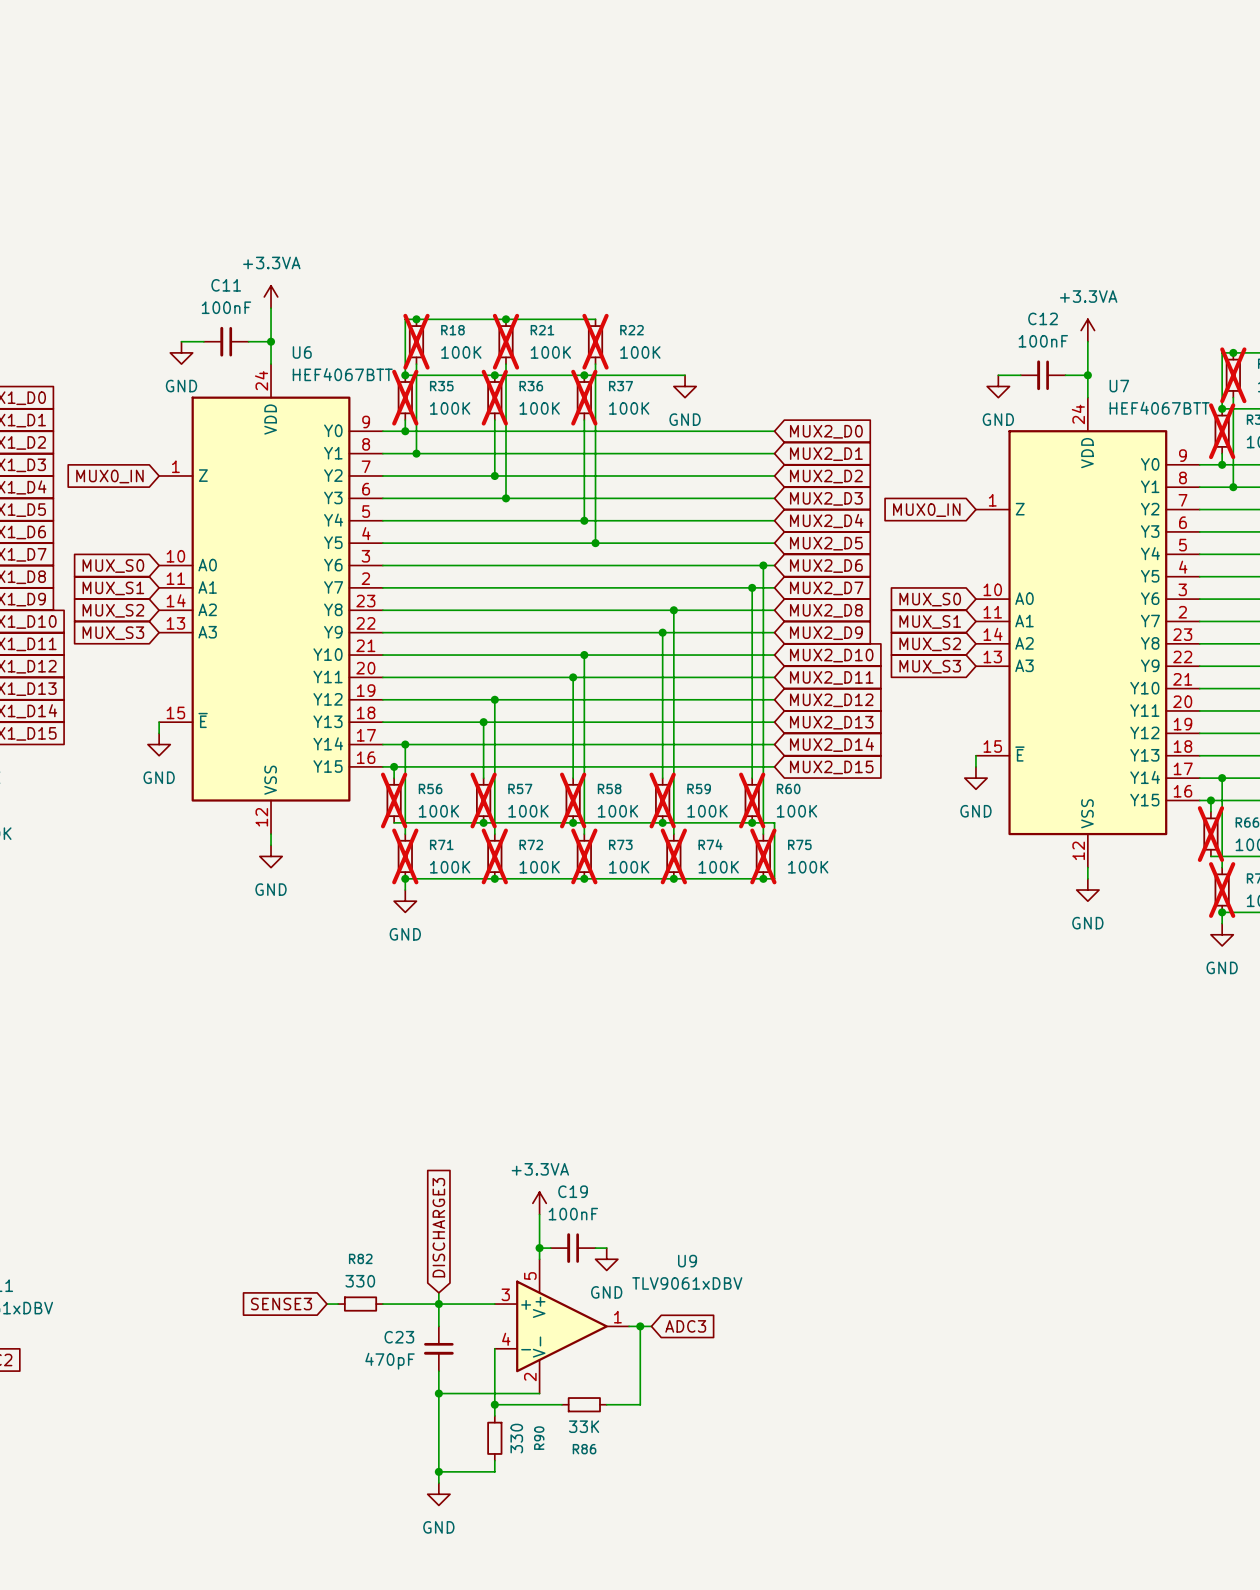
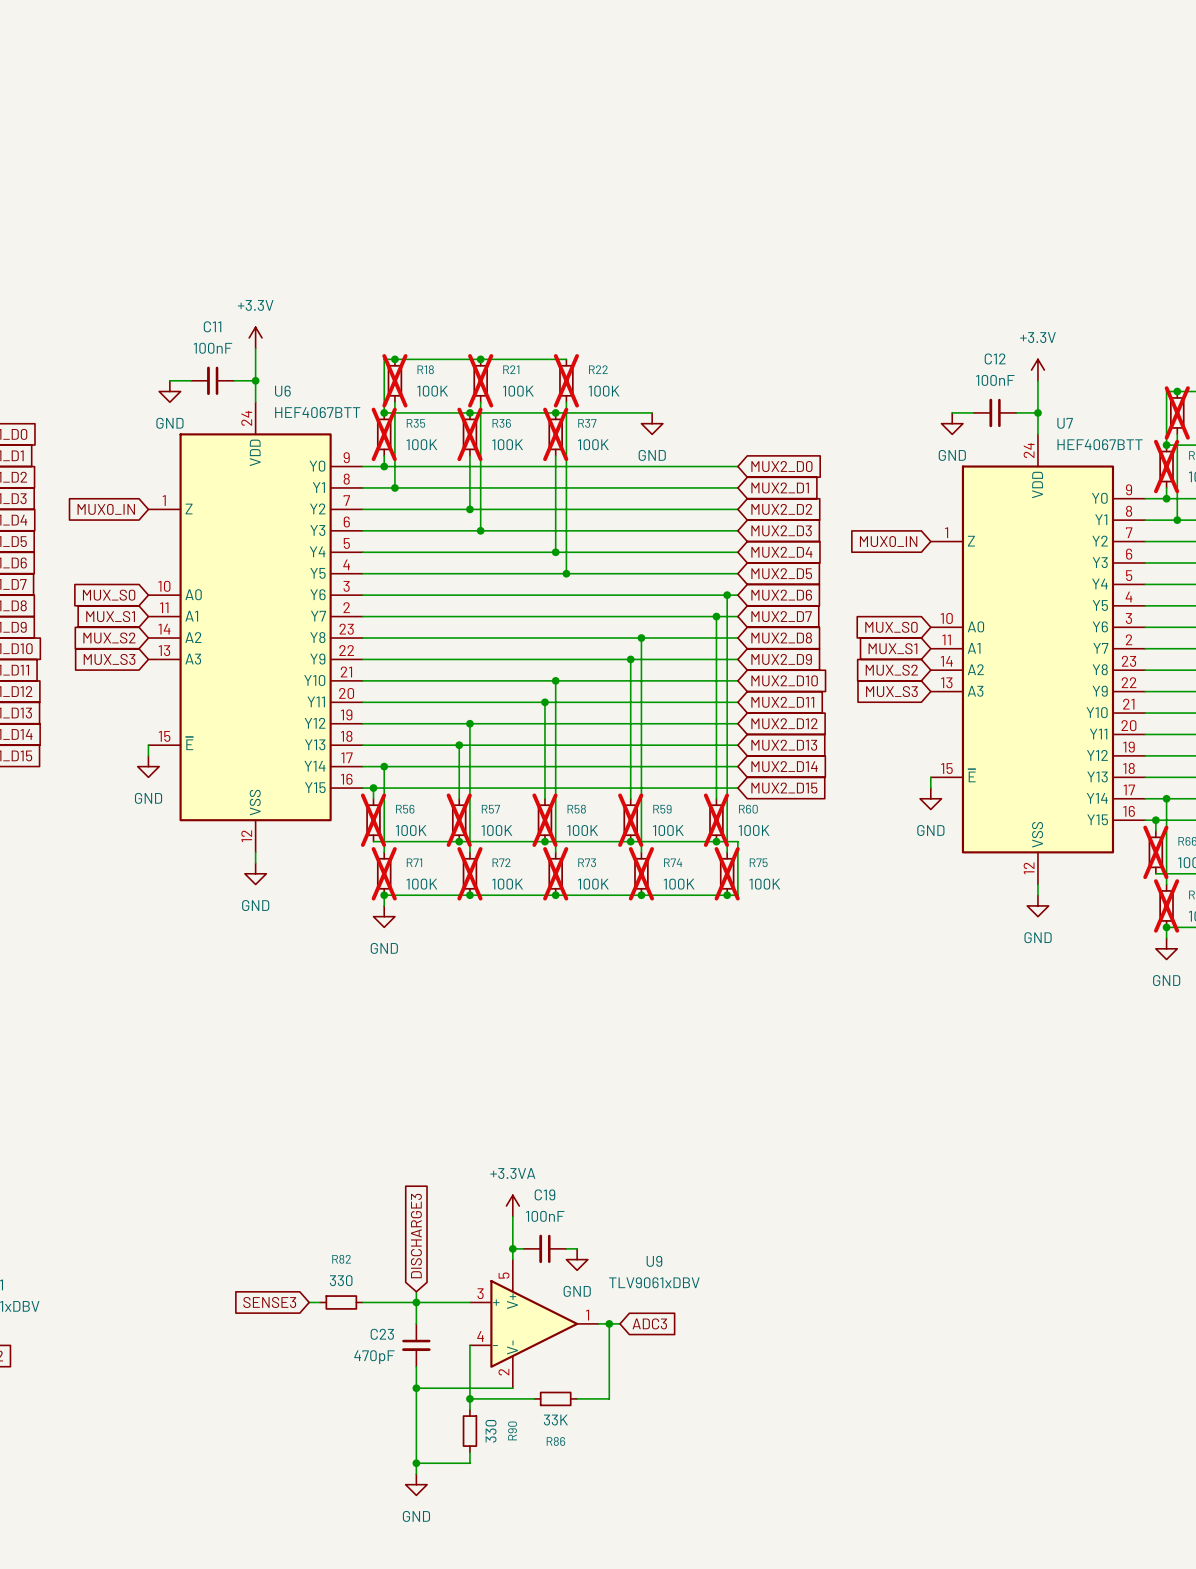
power symbol: +3.3VA (271, 296) -> +3.3V (255, 337)
power symbol: +3.3VA (1087, 330) -> +3.3V (1037, 370)

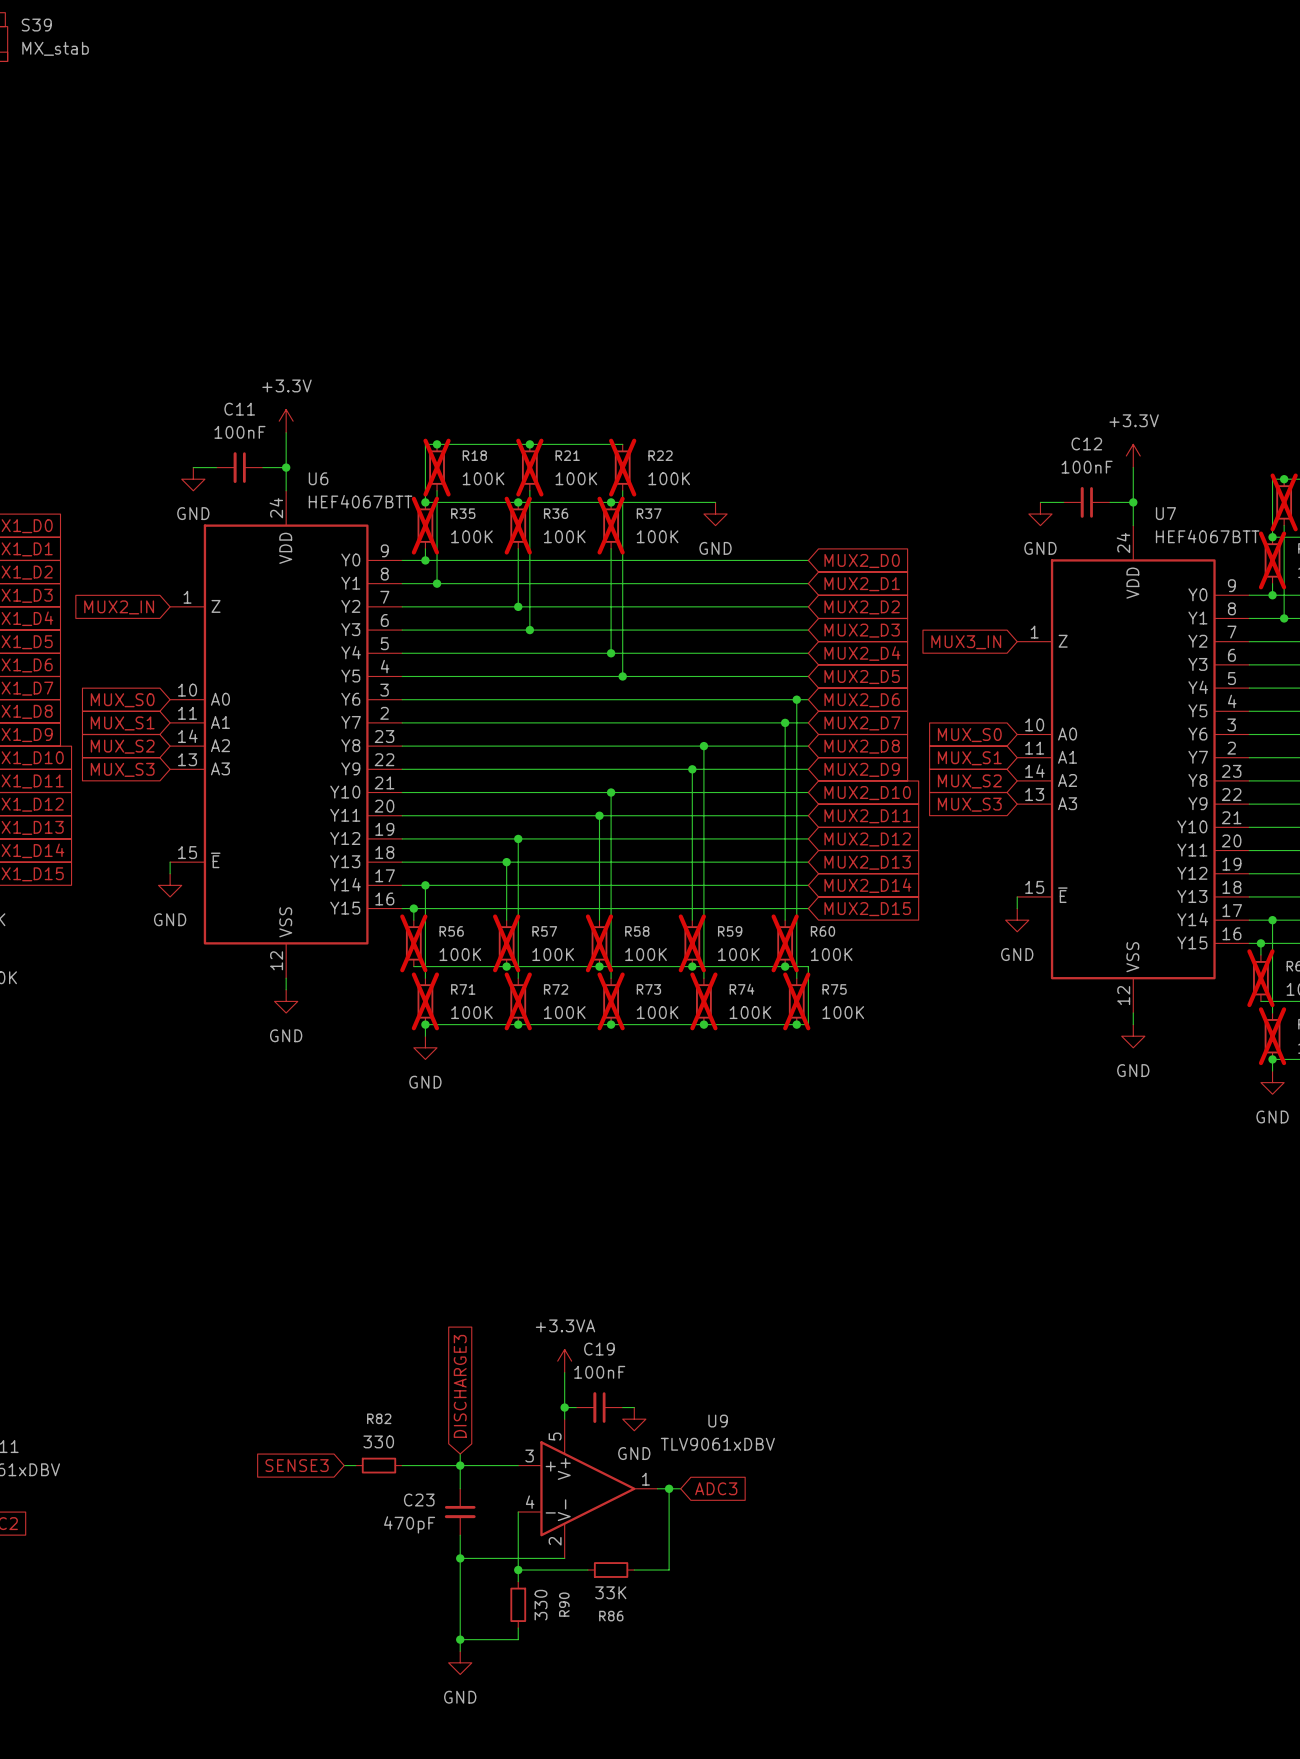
global label: MUX0_IN (106, 509) -> MUX2_IN (119, 607)
global label: MUX0_IN (888, 541) -> MUX3_IN (966, 642)

